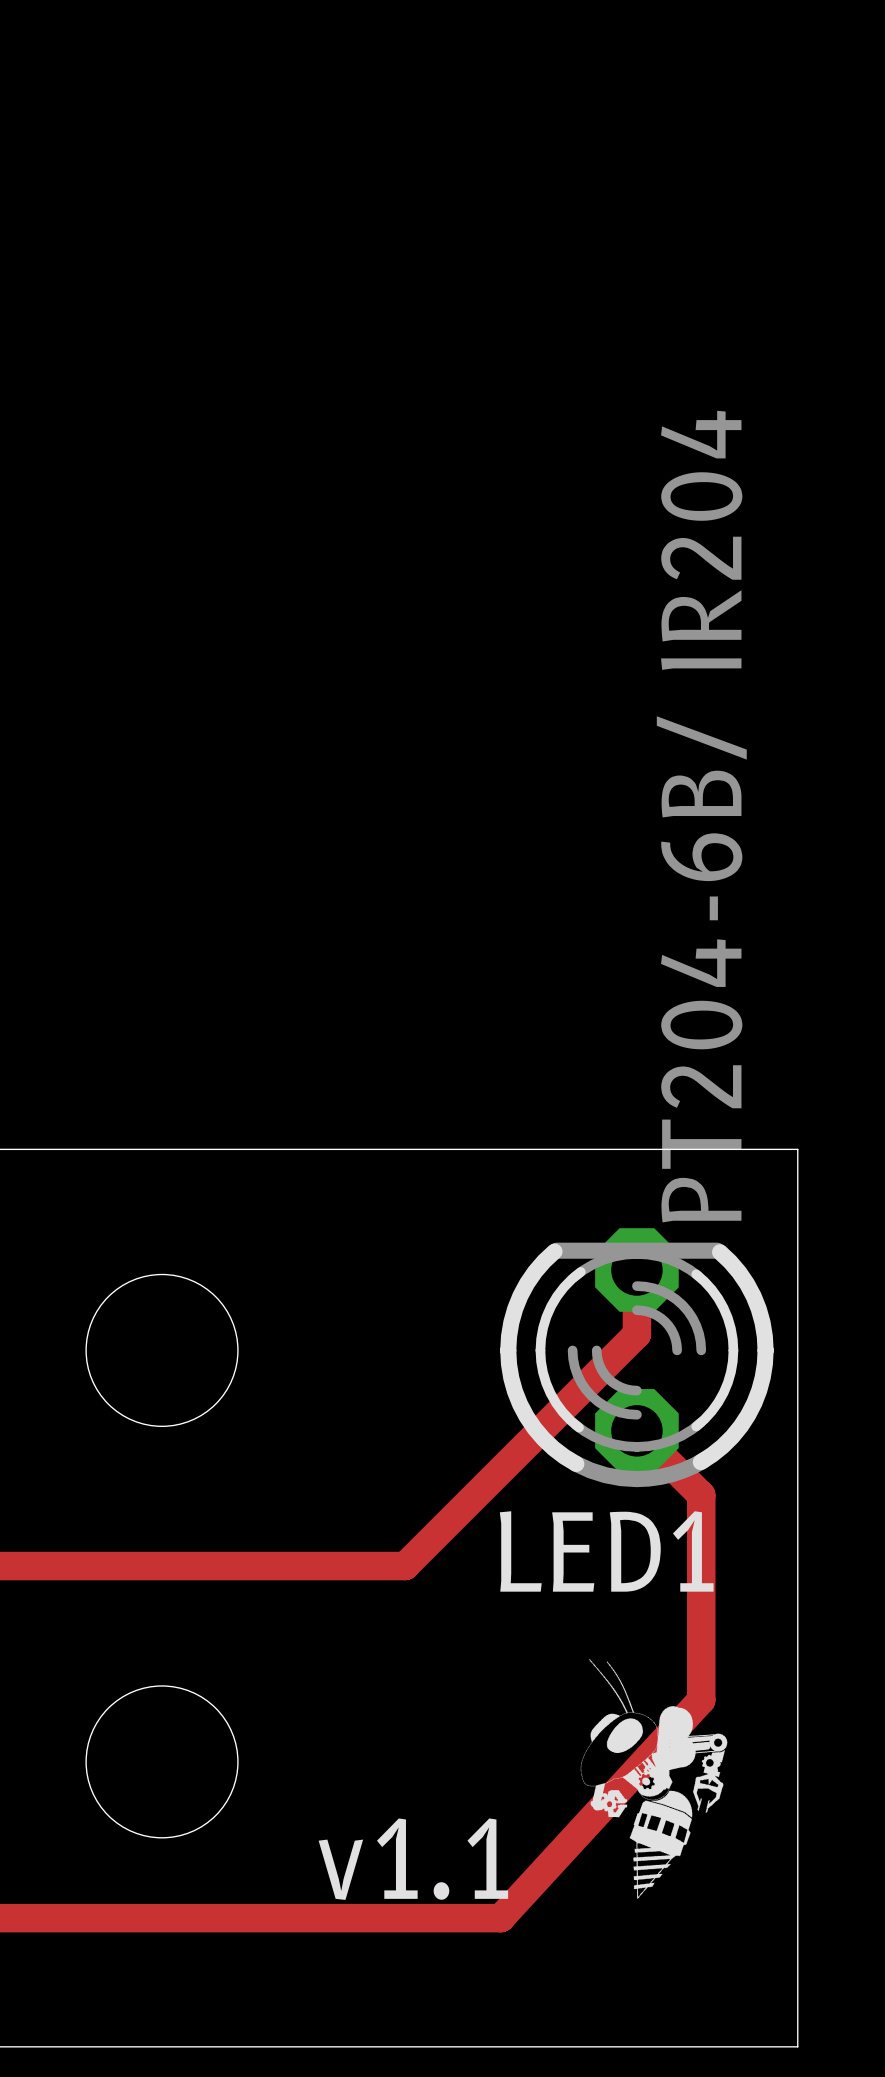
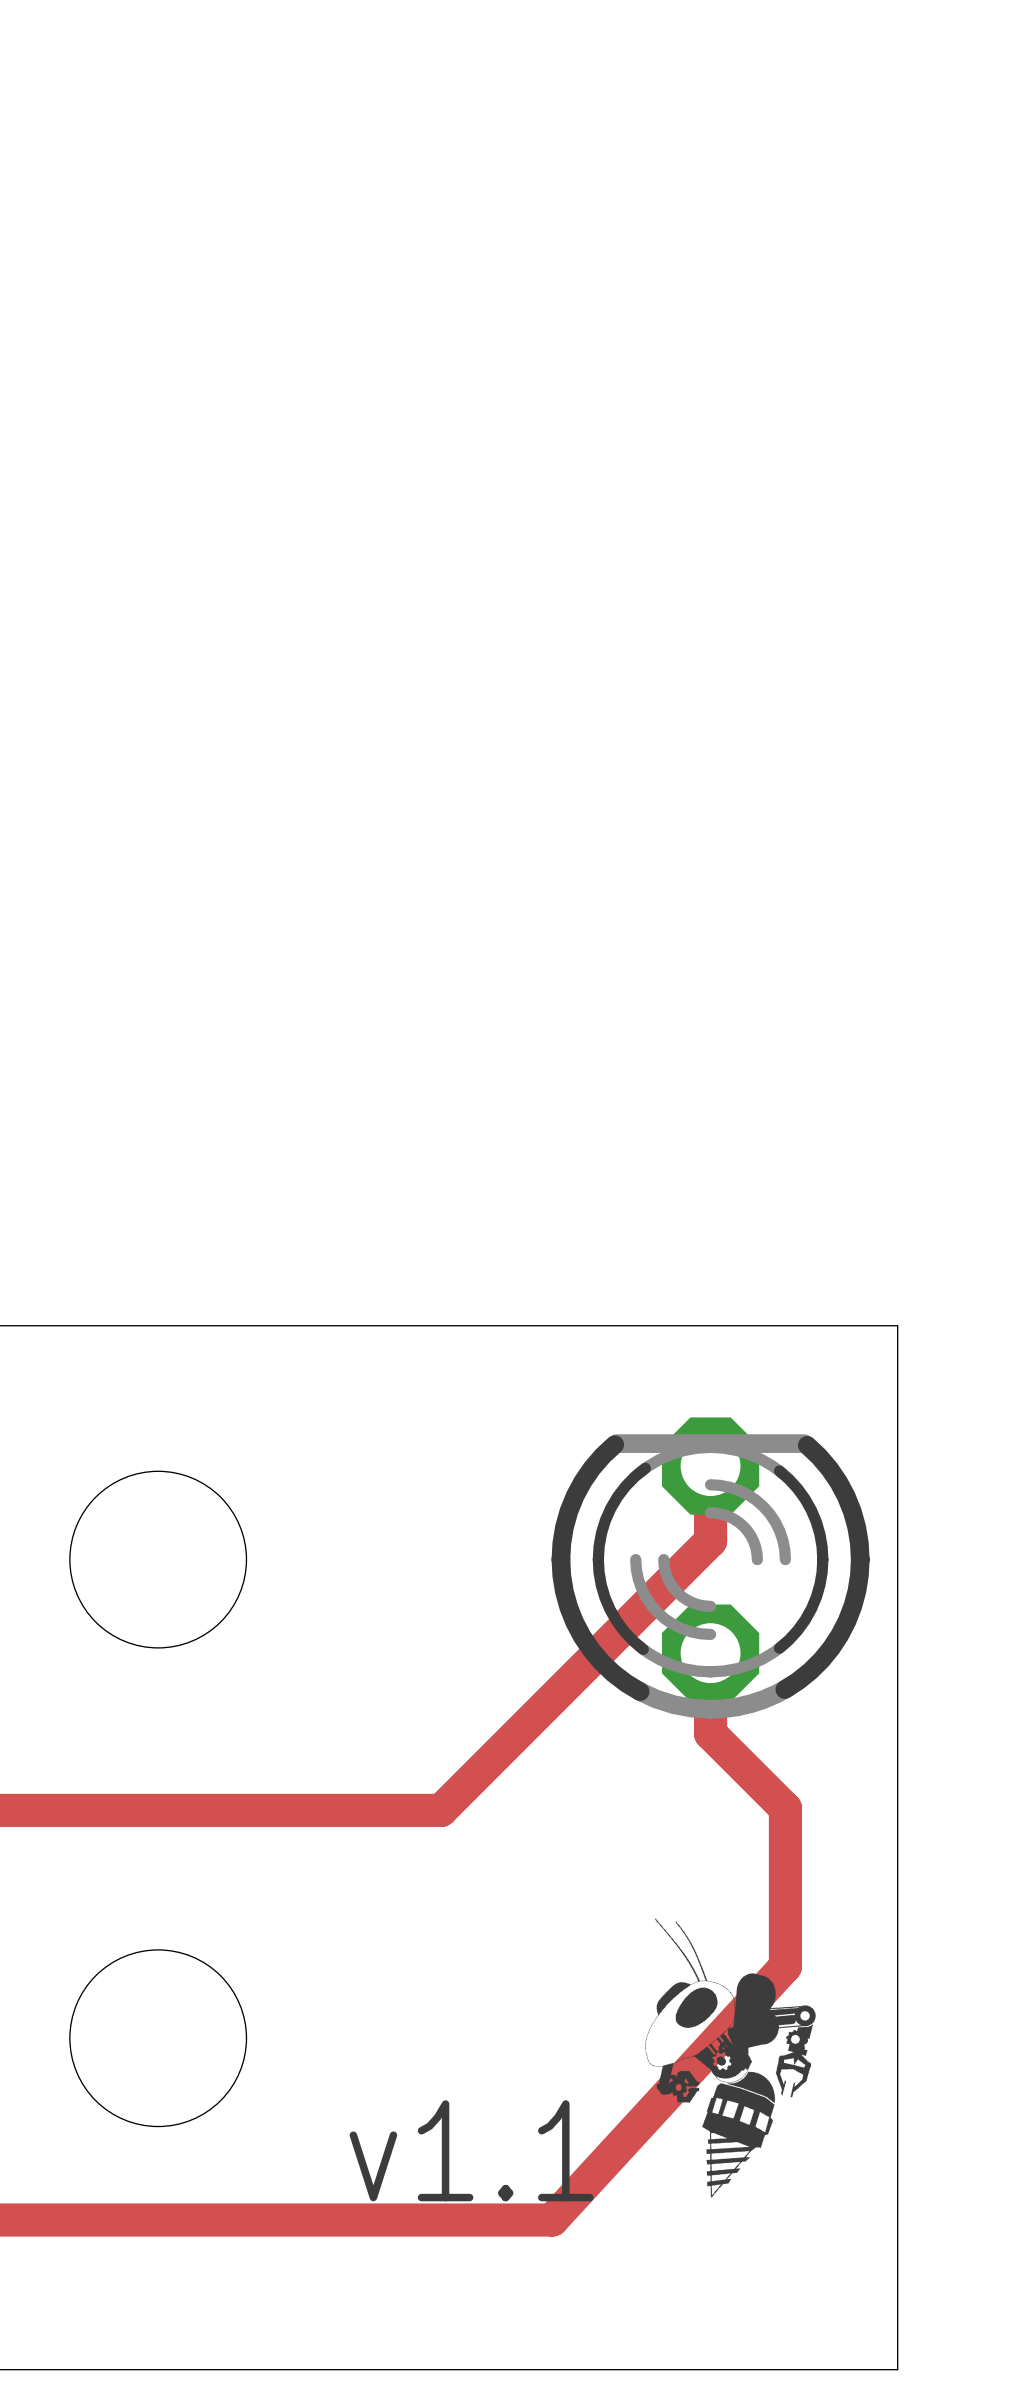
LED1 value: PT204-6B/ IR204 (701, 816) -> none
track: (636, 1430) (701, 1495) (701, 1564) -> (710, 1653) (710, 1733) (785, 1808)
LED1 name: LED1 (606, 1551) -> none

